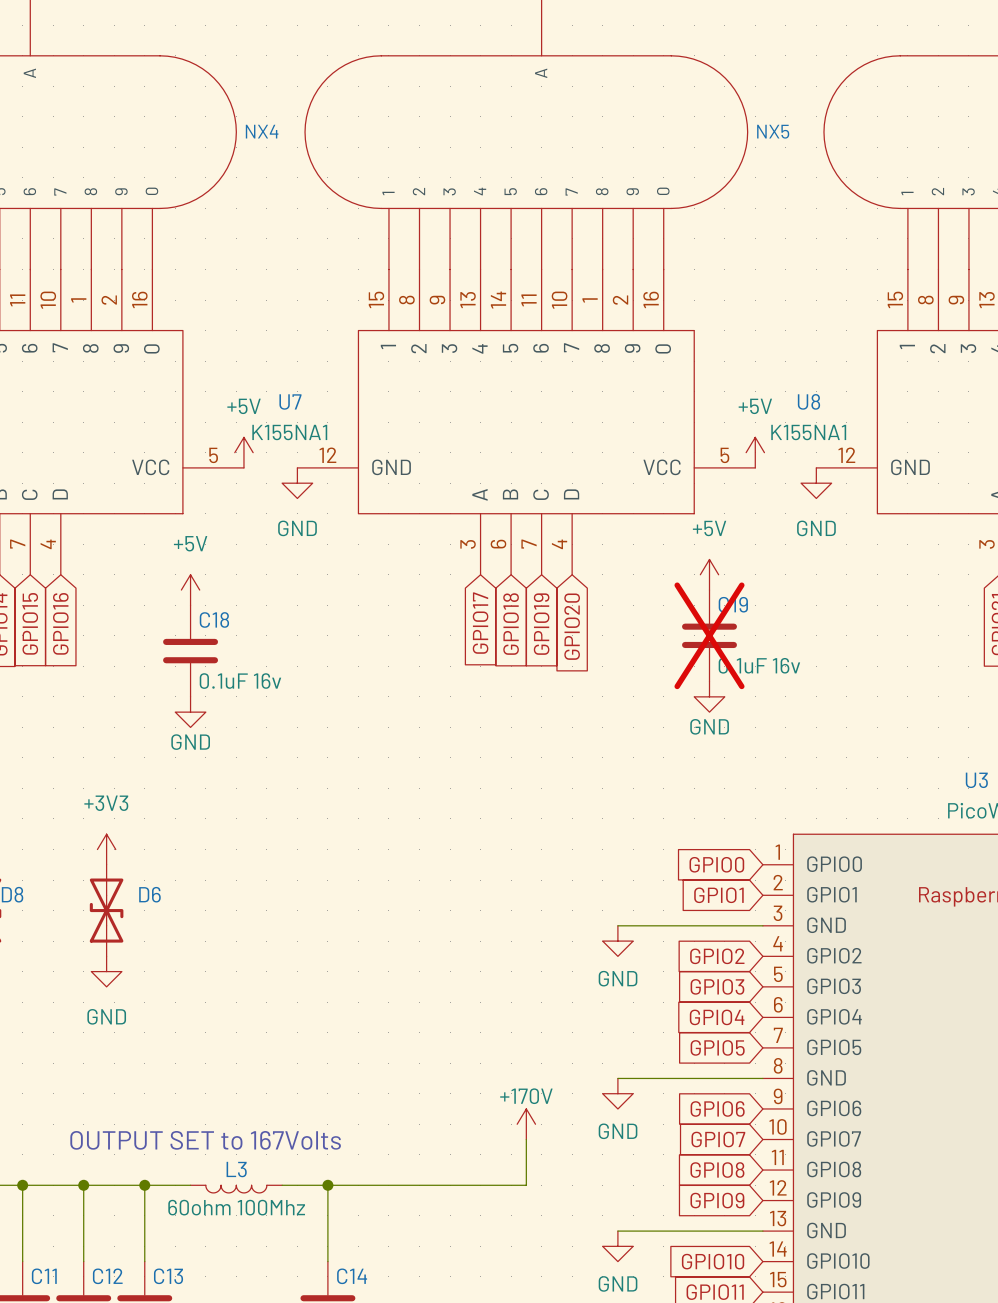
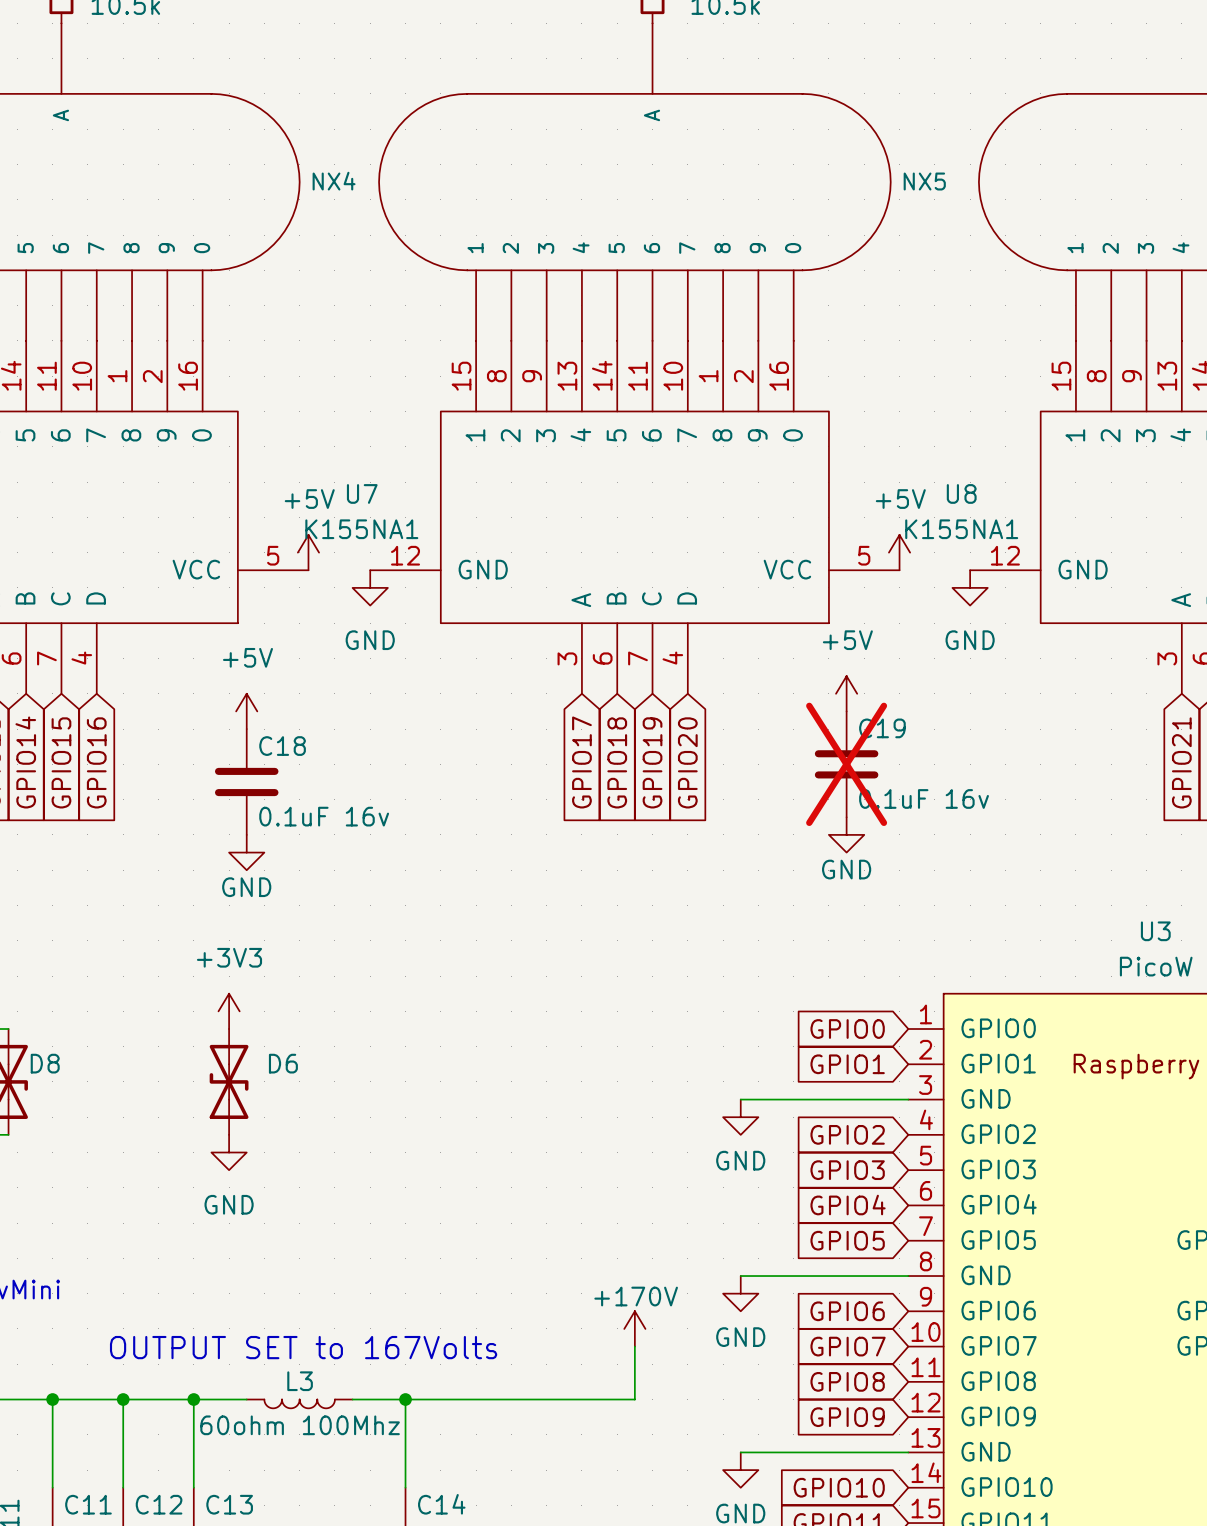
power symbol position: +3V3 (106, 849) -> +3V3 (229, 1011)
D6 position: (106, 910) -> (229, 1081)
power symbol position: GND (106, 971) -> GND (229, 1152)

